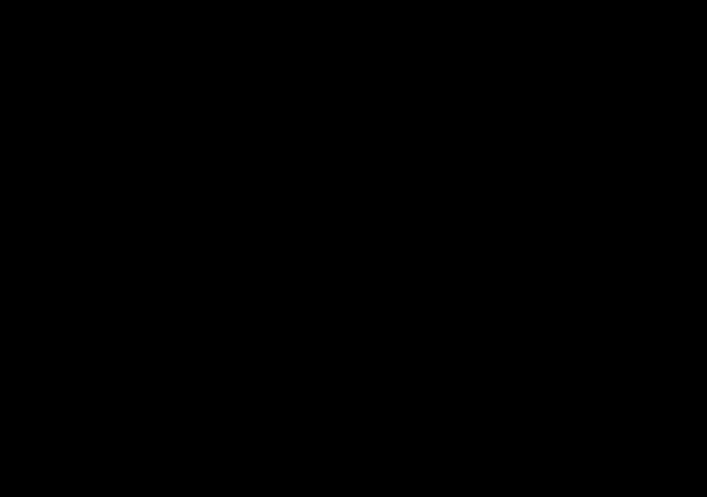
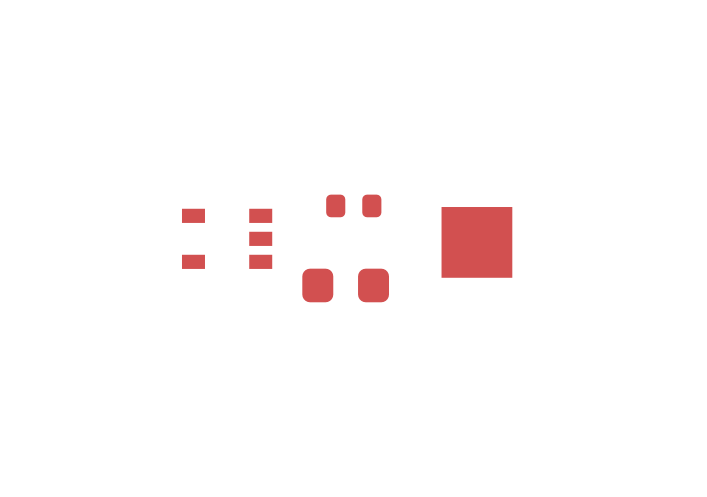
part: none -> (353, 205)
part: none -> (227, 238)
part: none -> (476, 242)
part: none -> (345, 285)

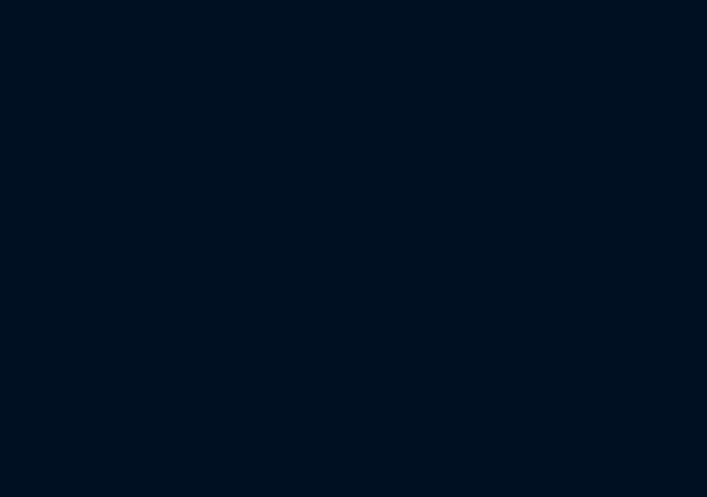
part: (353, 205) -> none
part: (227, 238) -> none
part: (476, 242) -> none
part: (345, 285) -> none

